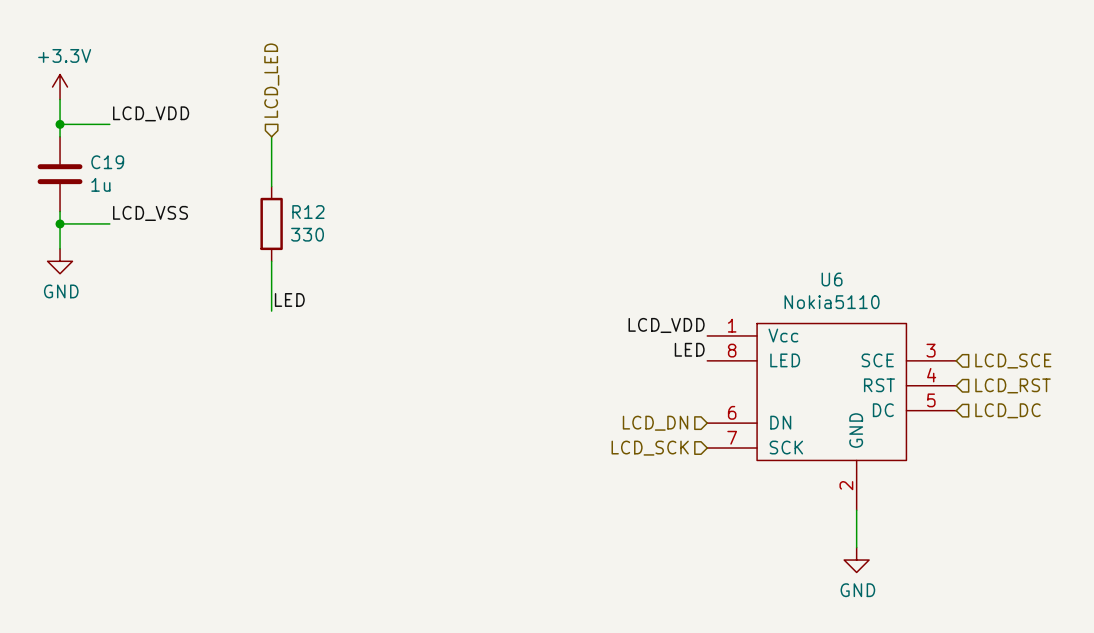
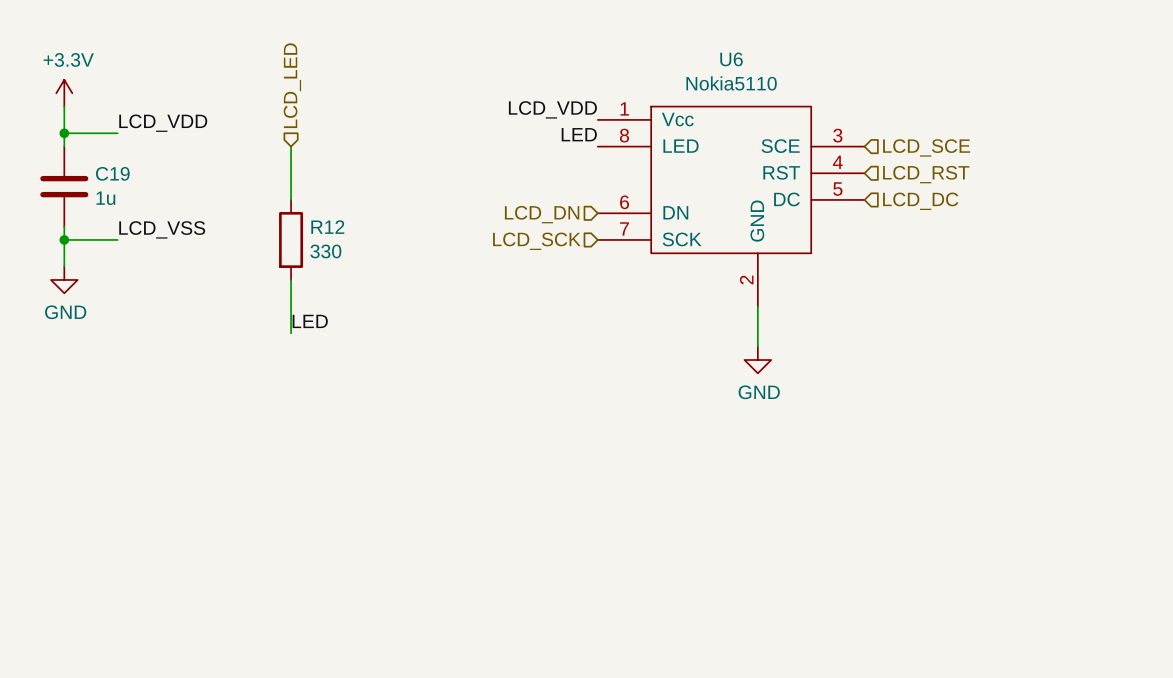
label: none -> LCD_VDD (552, 109)
label: none -> LED (579, 134)
hierarchical label: none -> LCD_SCE (926, 147)
hierarchical label: none -> LCD_RST (926, 174)
hierarchical label: none -> LCD_DC (920, 201)
hierarchical label: none -> LCD_DN (542, 214)
hierarchical label: none -> LCD_SCK (536, 241)
wire: none -> (757, 306) (757, 346)
label: LCD_VDD (666, 325) -> none
power symbol: none -> GND (757, 360)
label: LED (689, 349) -> none
hierarchical label: LCD_SCE (1013, 361) -> none
hierarchical label: LCD_RST (1013, 385) -> none
hierarchical label: LCD_DC (1007, 410) -> none
U6 position: (831, 416) -> (731, 206)
hierarchical label: LCD_DN (655, 423) -> none
hierarchical label: LCD_SCK (650, 448) -> none
wire: (856, 510) (856, 547) -> none
power symbol: GND (856, 560) -> none

